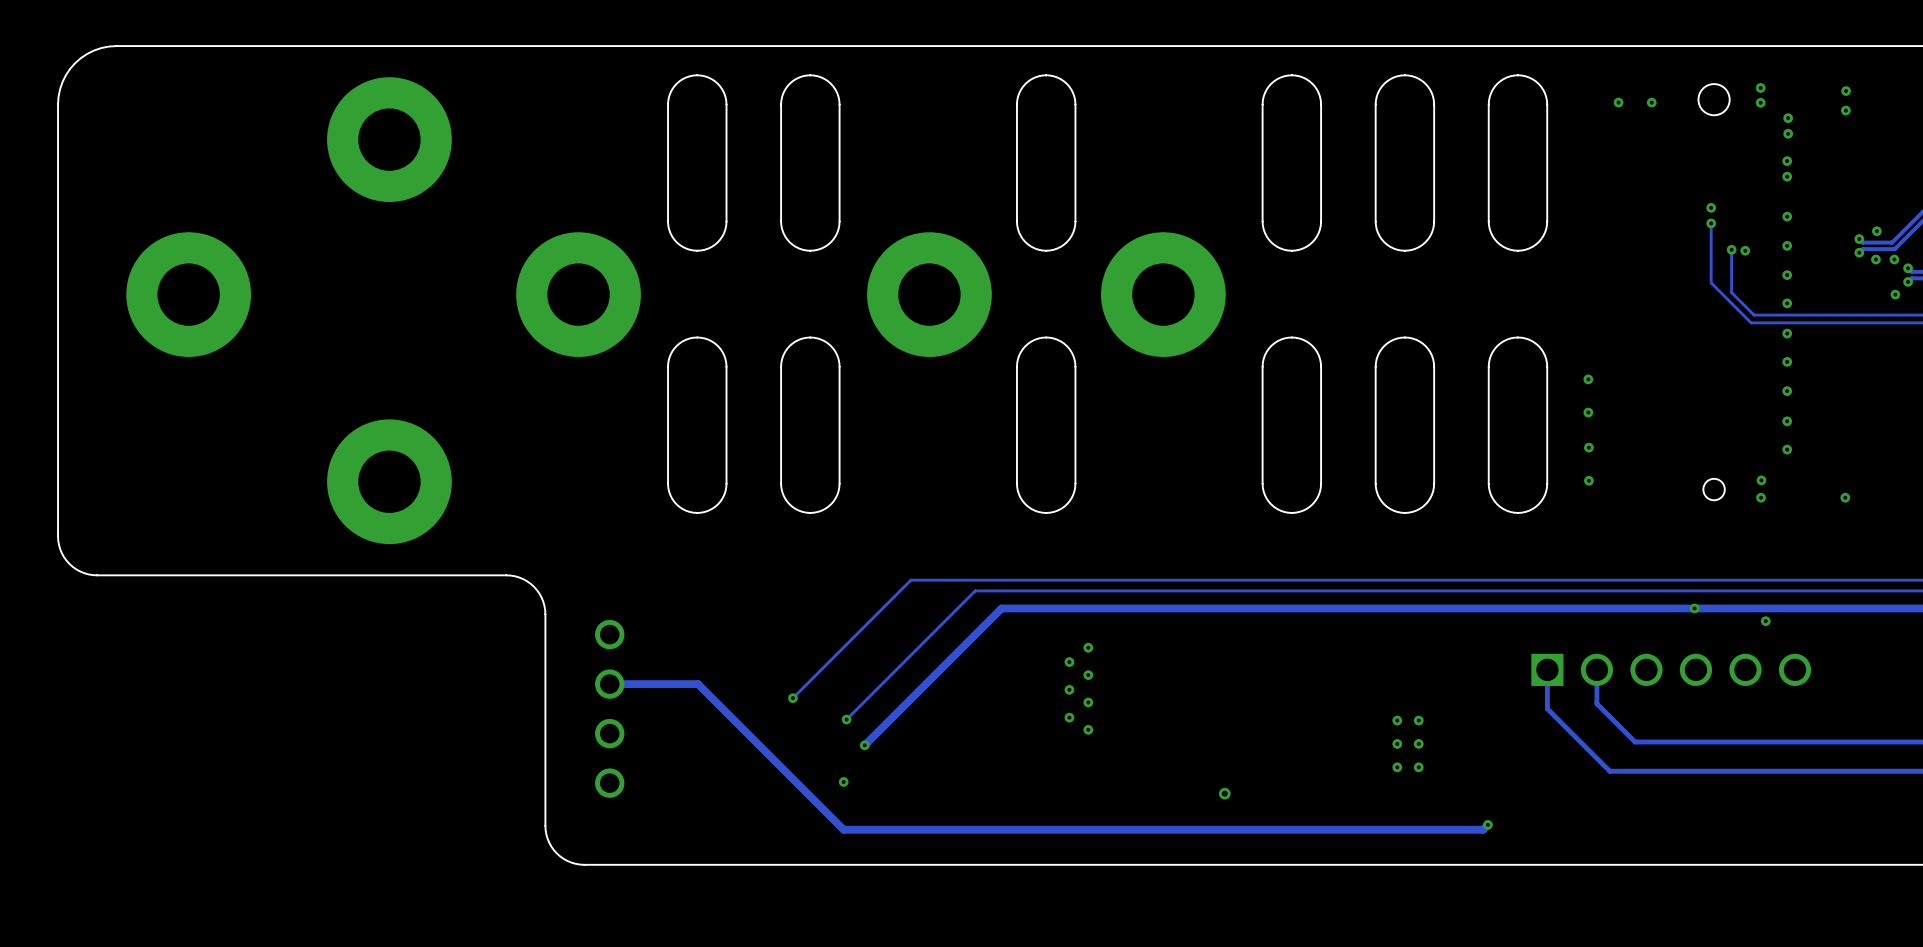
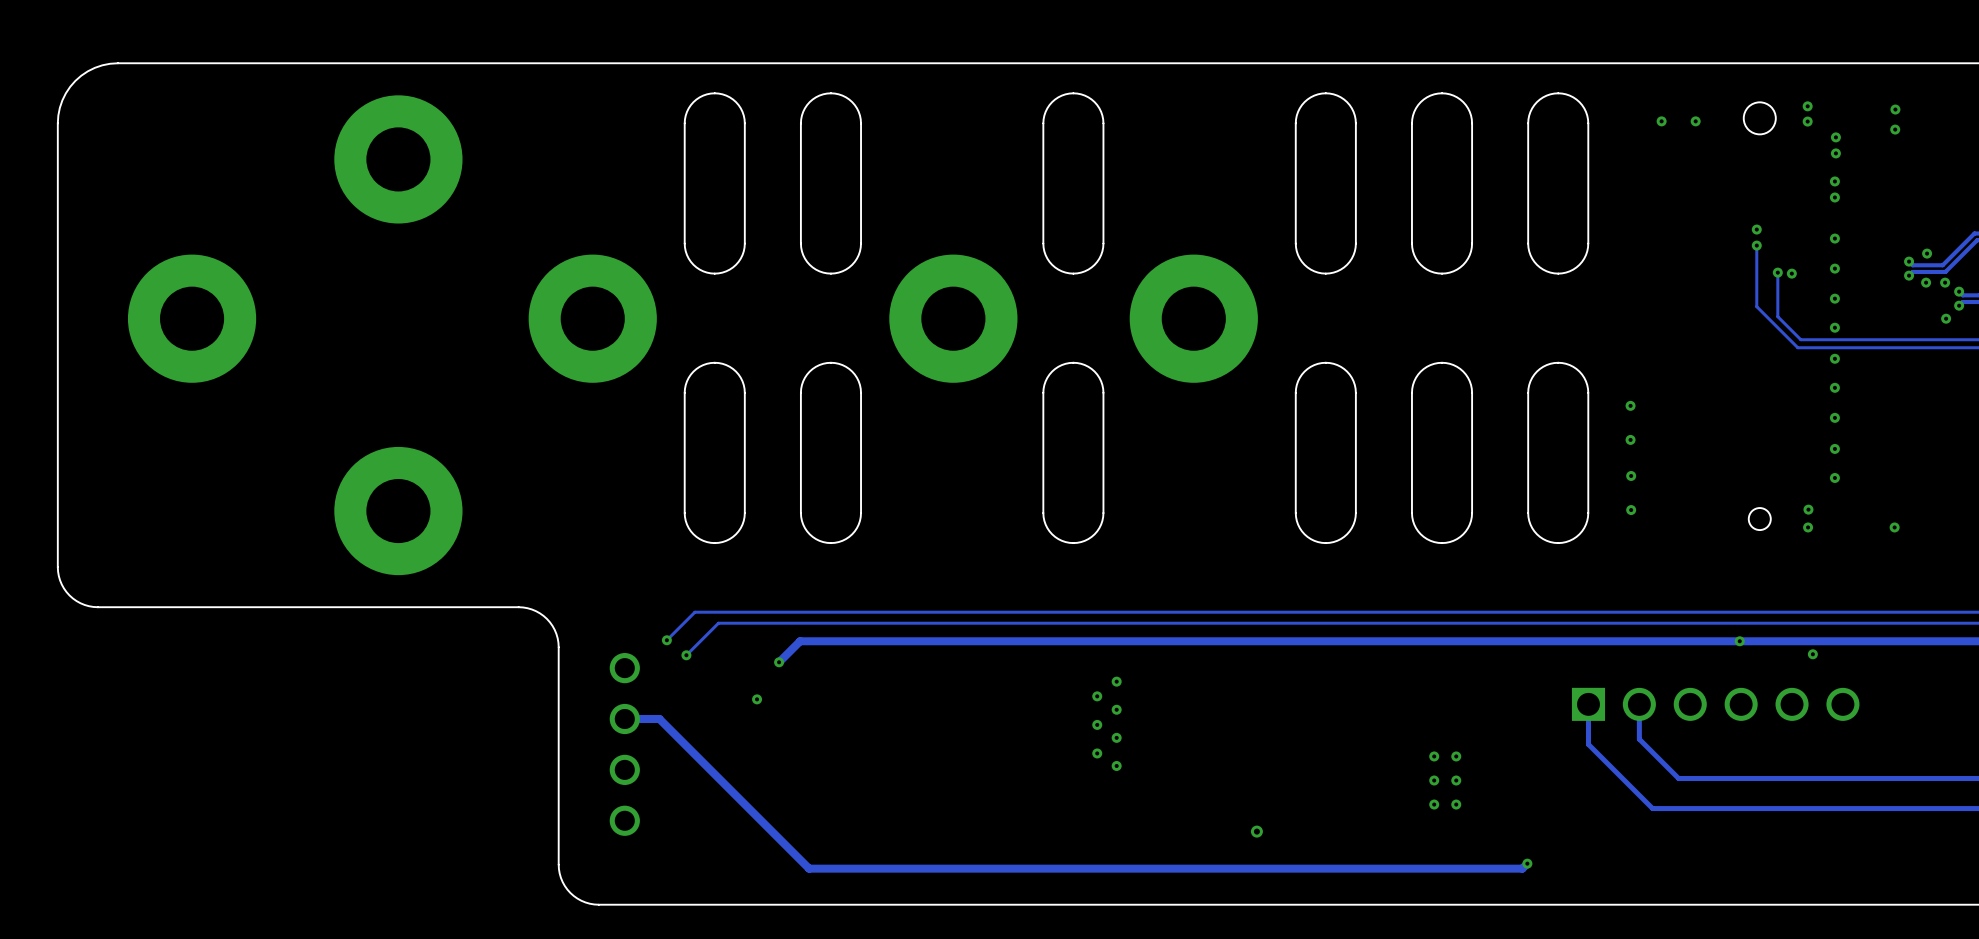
track: (910, 580) (792, 698) -> (934, 612) (694, 612) (666, 640)
track: (975, 590) (846, 719) -> (1000, 623) (718, 623) (686, 655)
via: none -> (666, 640)
track: (1001, 608) (864, 745) -> (1027, 641) (800, 641) (779, 662)
via: none -> (686, 655)
via: none -> (779, 662)
via: none -> (757, 699)
track: (643, 684) (698, 684) (843, 829) -> (659, 719) (809, 868) (865, 868)
via: (792, 698) -> none
via: (846, 719) -> none
via: (864, 745) -> none
via: (843, 781) -> none

